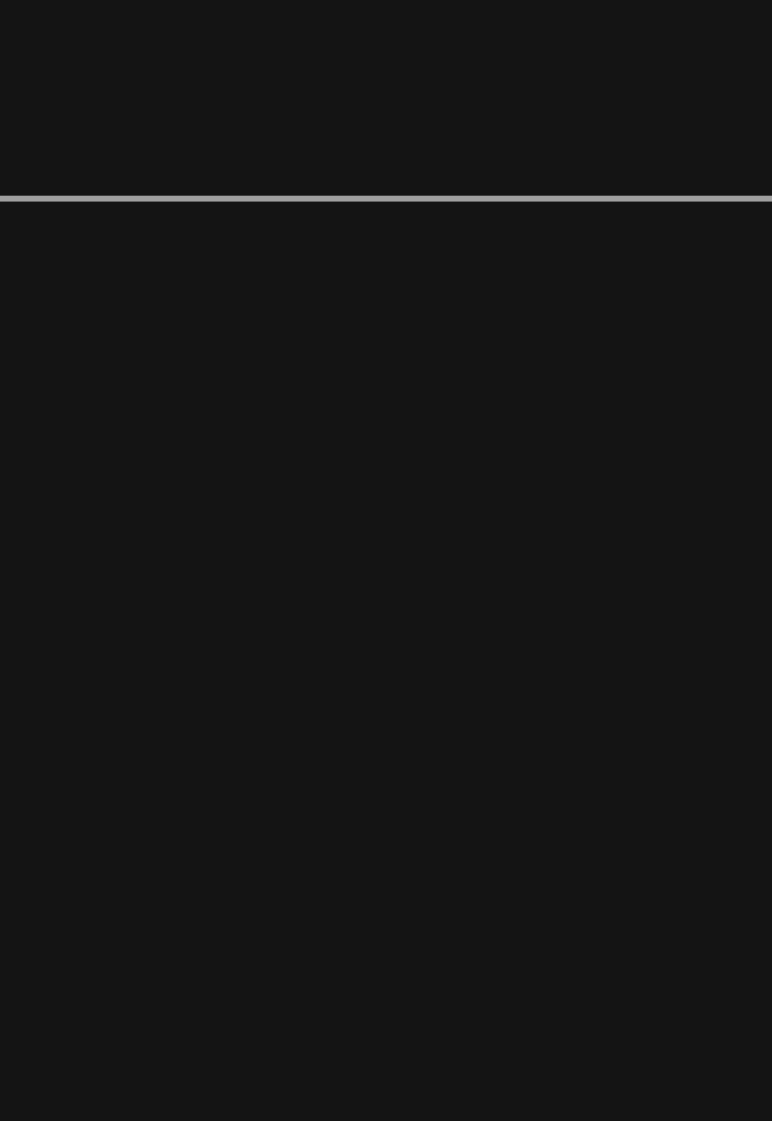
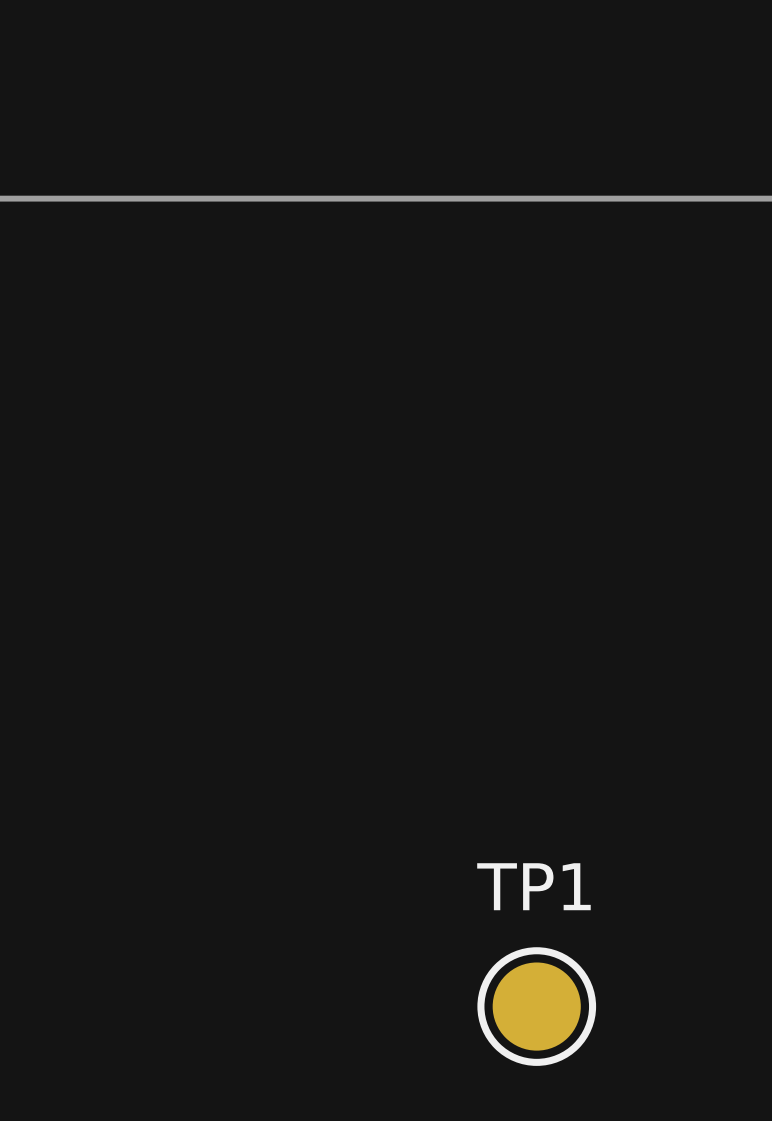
TP1: none -> (536, 1006)

